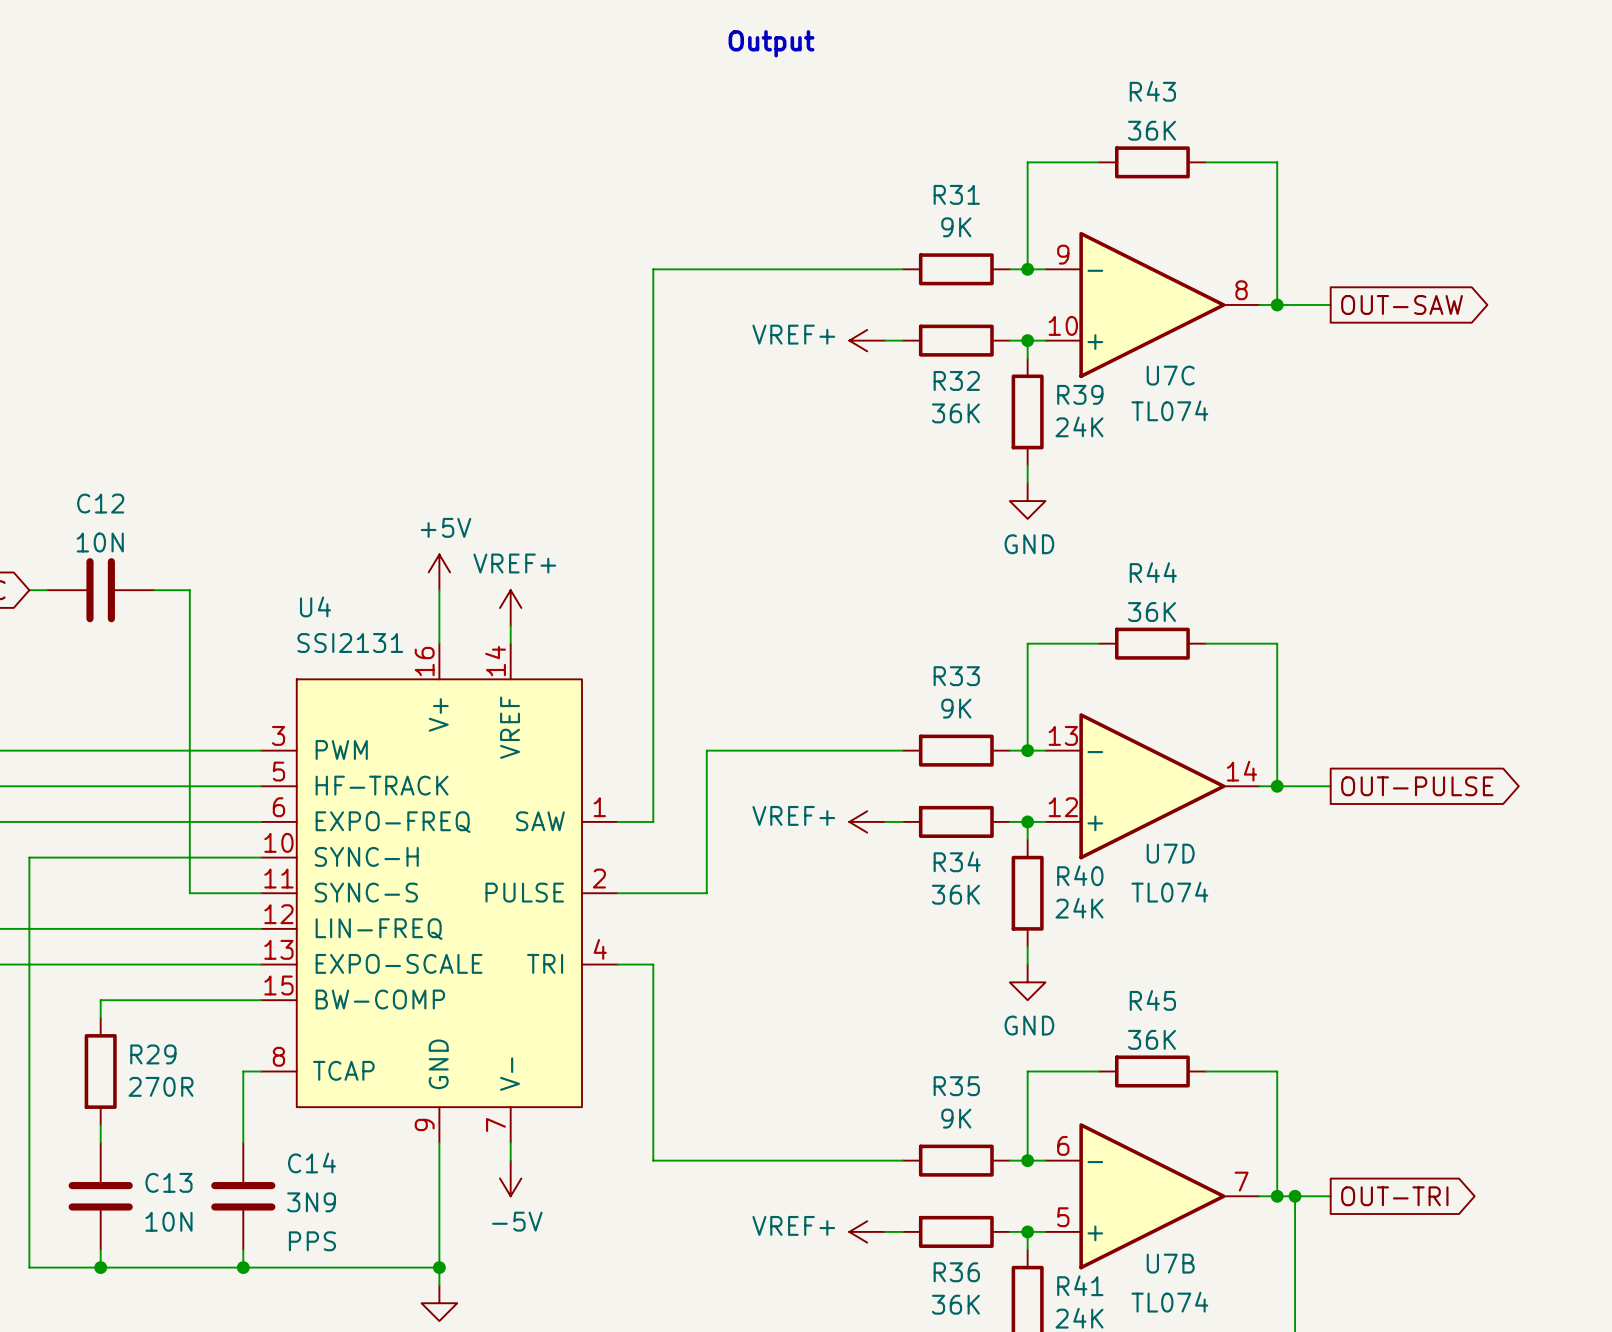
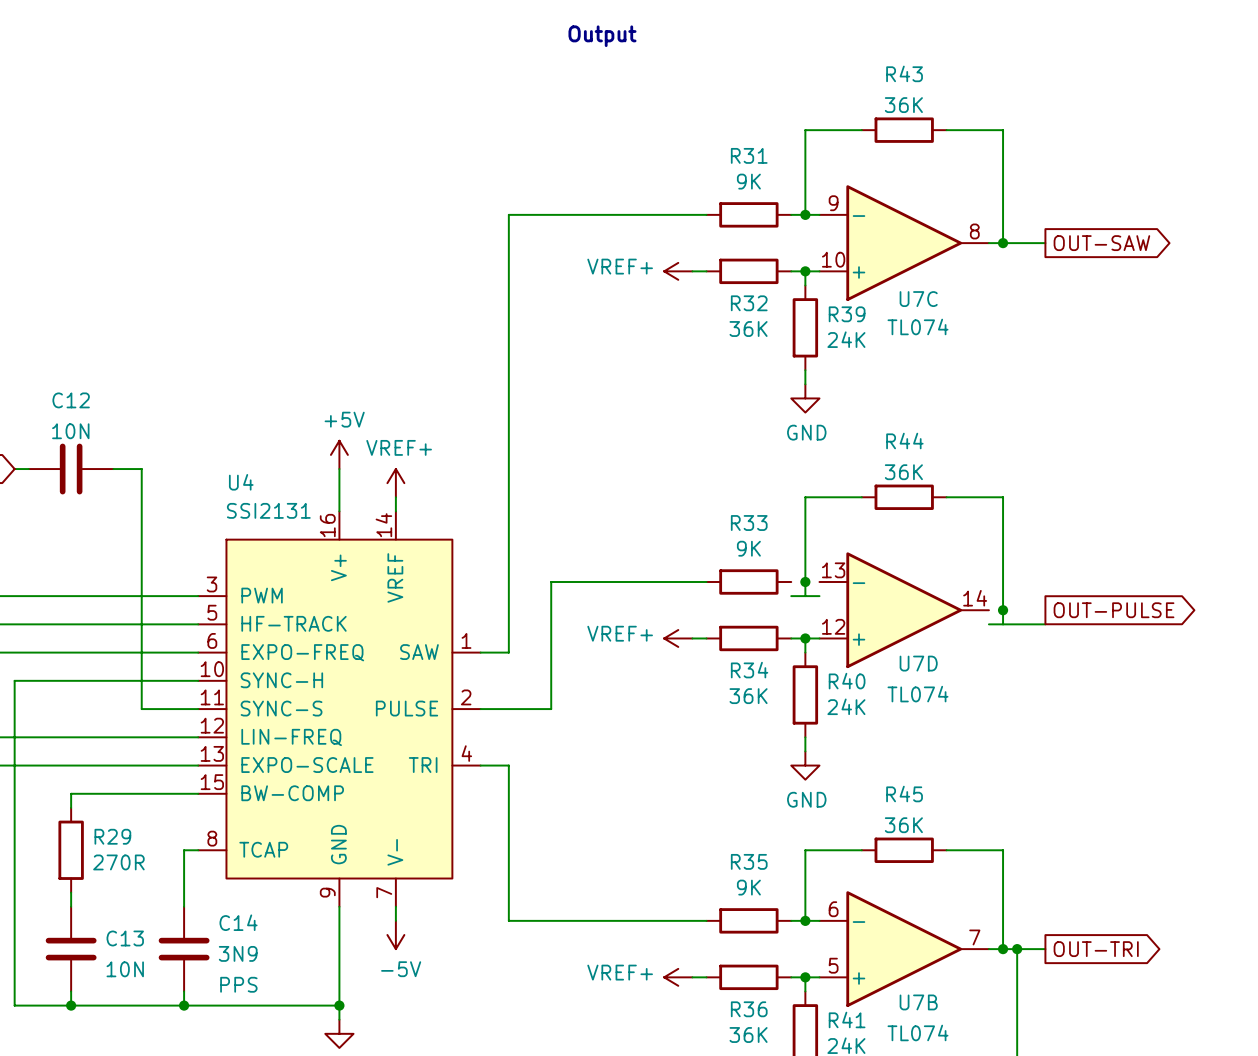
wire: (1027, 643) (1098, 643) -> (805, 511) (805, 497) (861, 497)
R44 position: (1152, 643) -> (904, 497)
wire: (1205, 643) (1277, 643) -> (946, 497) (1003, 497) (1003, 511)
wire: (706, 750) (902, 750) -> (551, 596) (551, 581) (706, 581)
R33 position: (956, 750) -> (748, 581)
junction position: (1027, 750) -> (805, 581)
U7D position: (1152, 786) -> (904, 610)
junction position: (1277, 786) -> (1003, 610)
global label position: OUT-PULSE (1417, 786) -> OUT-PULSE (1114, 610)
power symbol position: VREF+ (867, 821) -> VREF+ (678, 638)
wire: (885, 821) (902, 821) -> (692, 638) (706, 638)
R34 position: (956, 821) -> (748, 638)
wire: (1009, 821) (1045, 821) -> (791, 638) (819, 638)
junction position: (1027, 821) -> (805, 638)
R40 position: (1027, 893) -> (805, 694)
power symbol position: GND (1027, 982) -> GND (805, 765)

